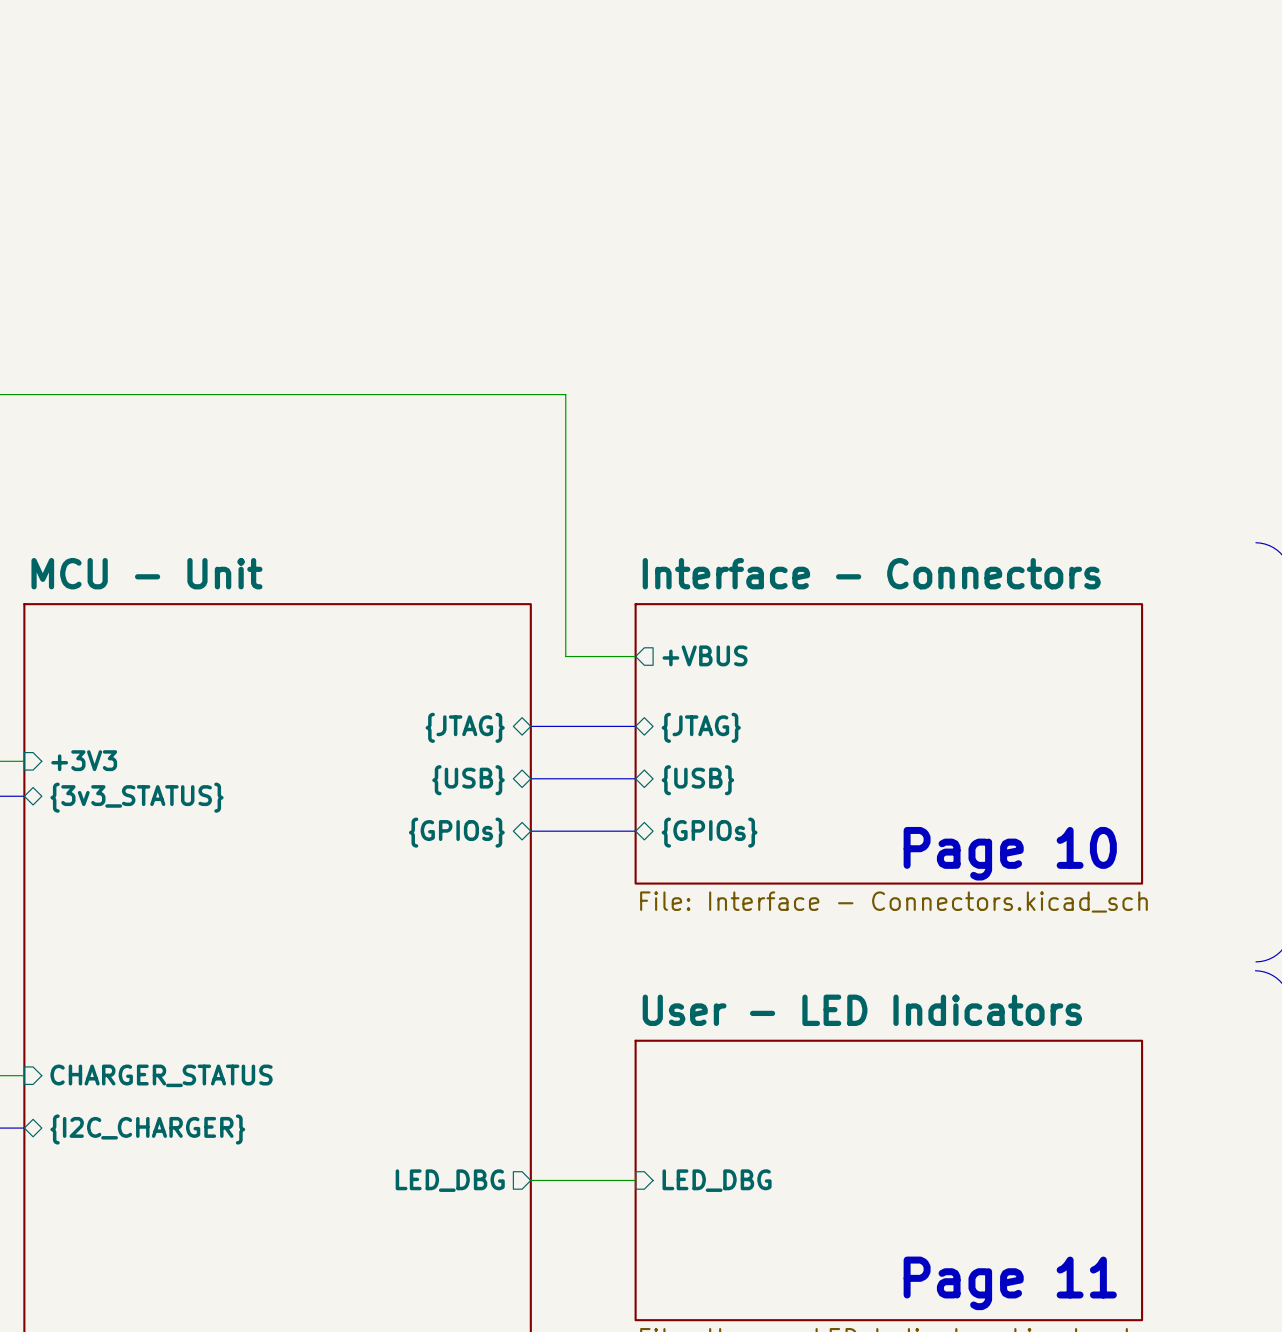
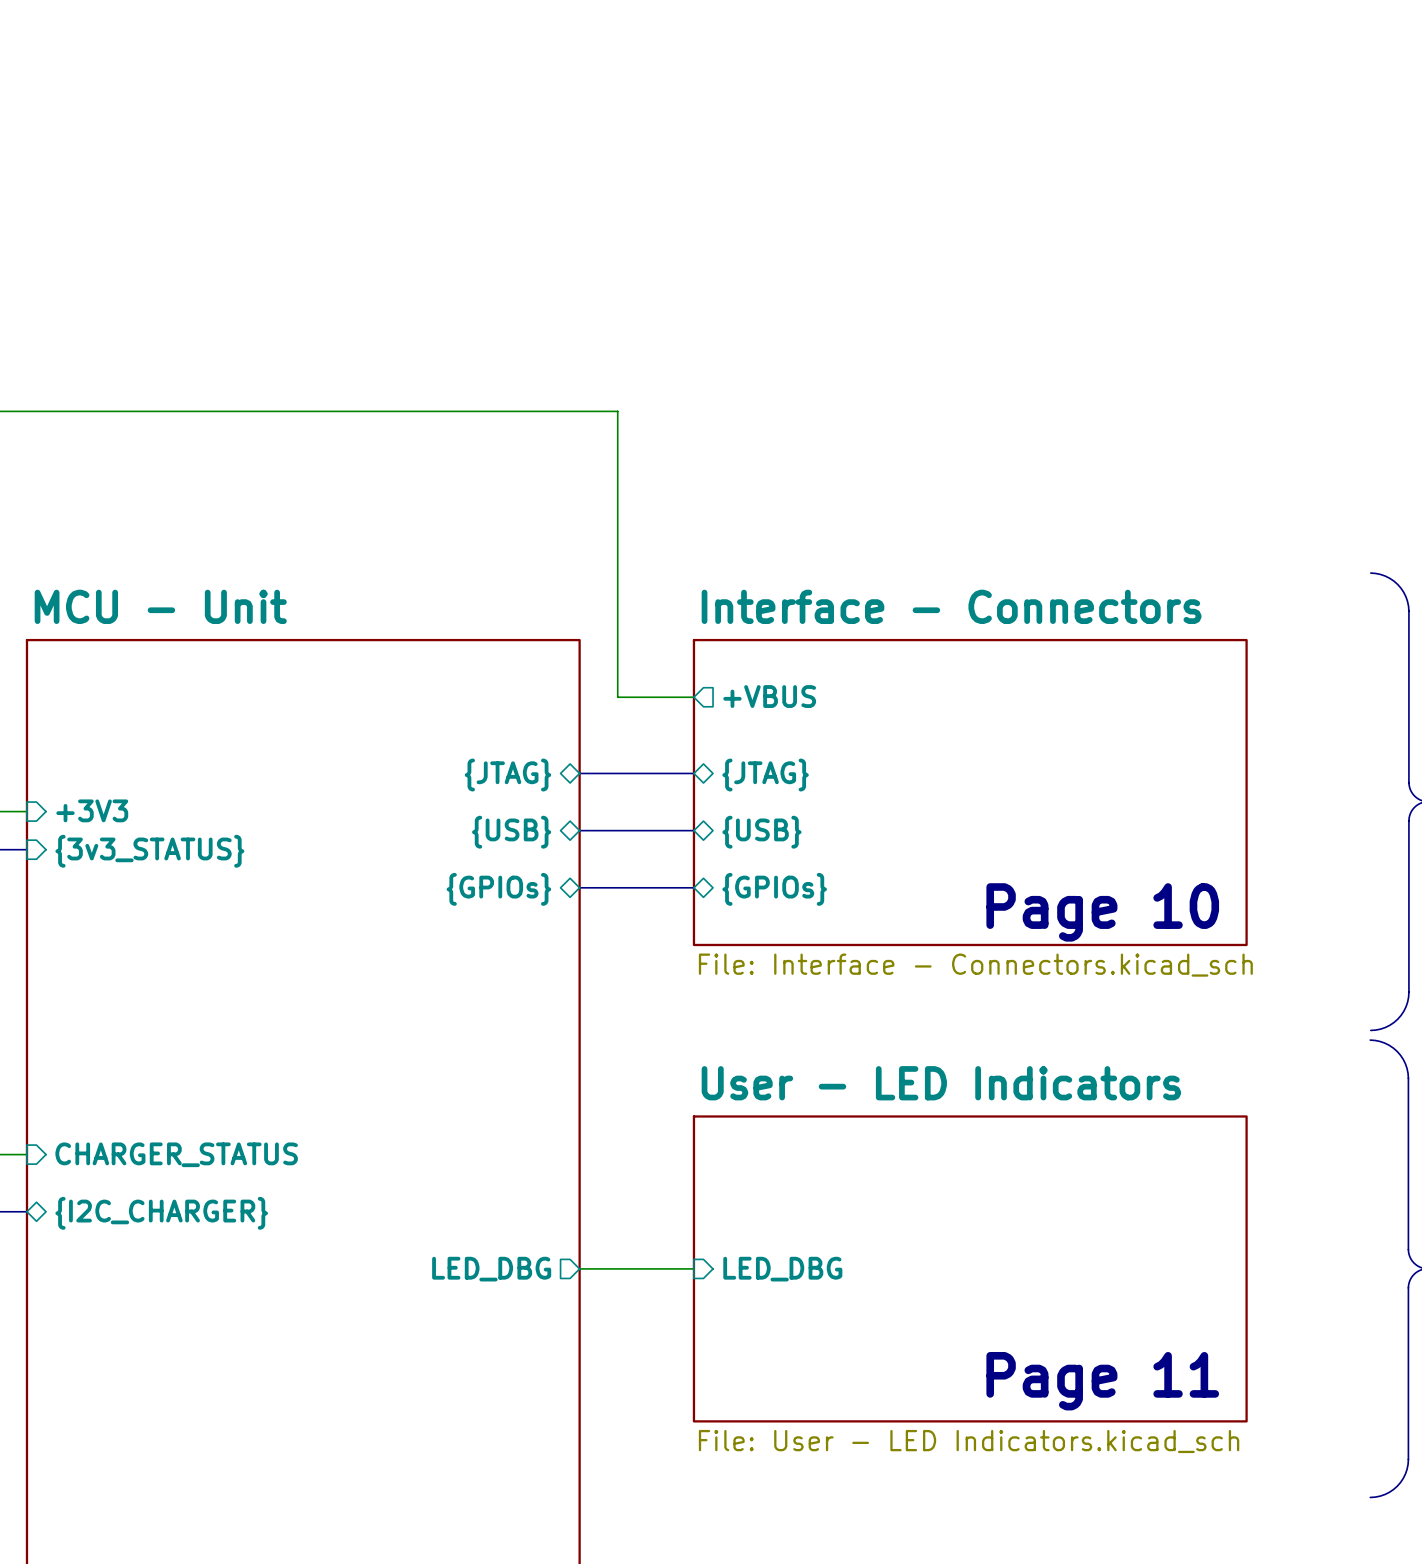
sheet pin shape: bidirectional (137, 797) -> input (149, 851)

